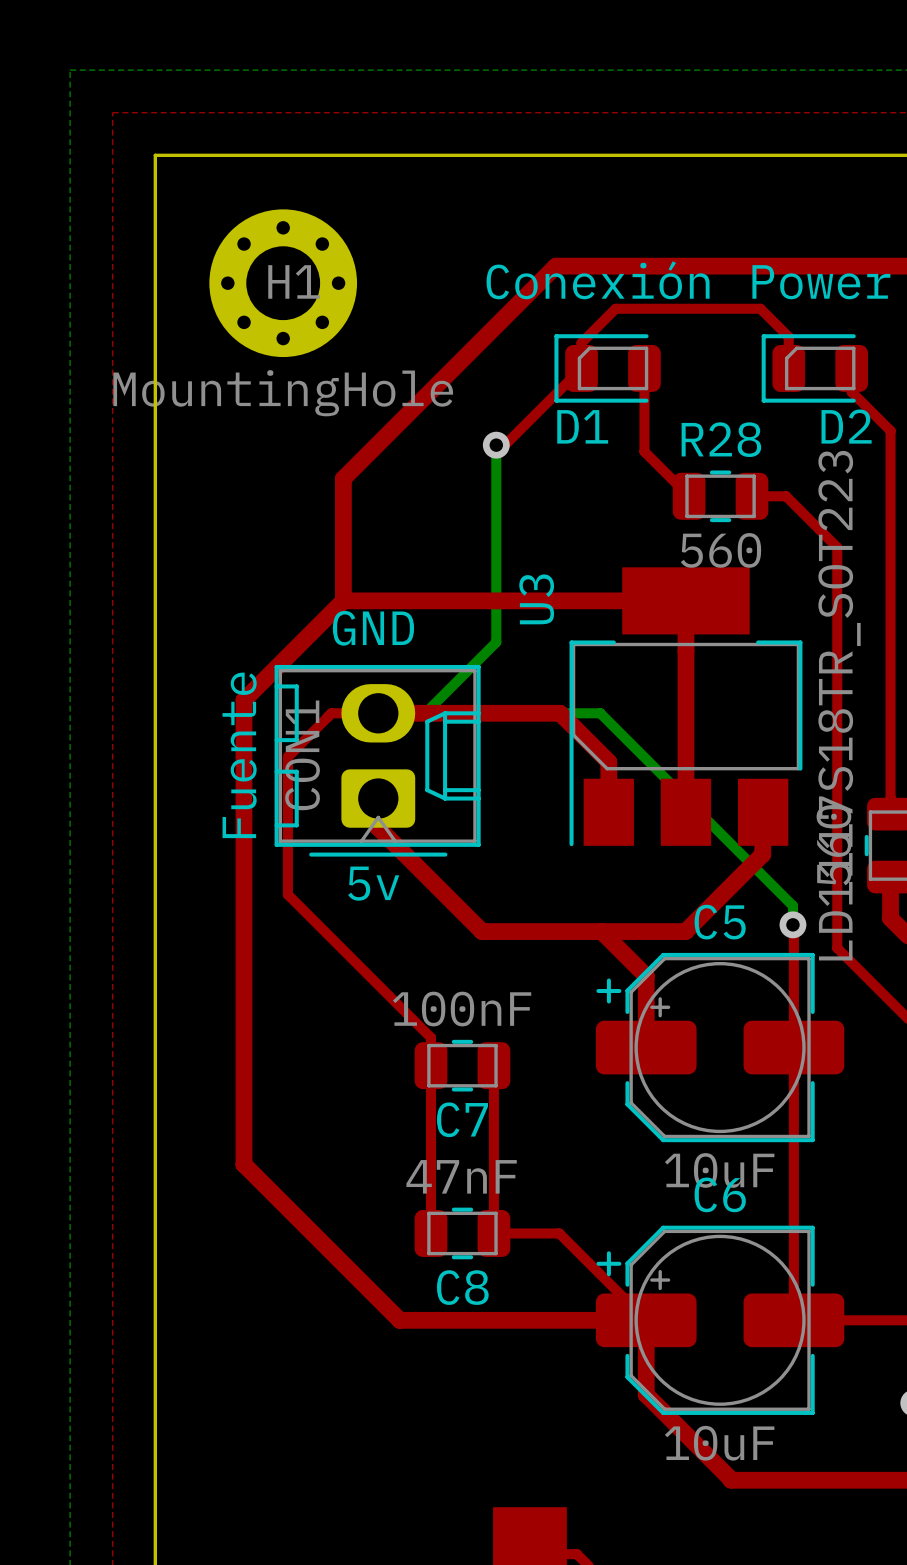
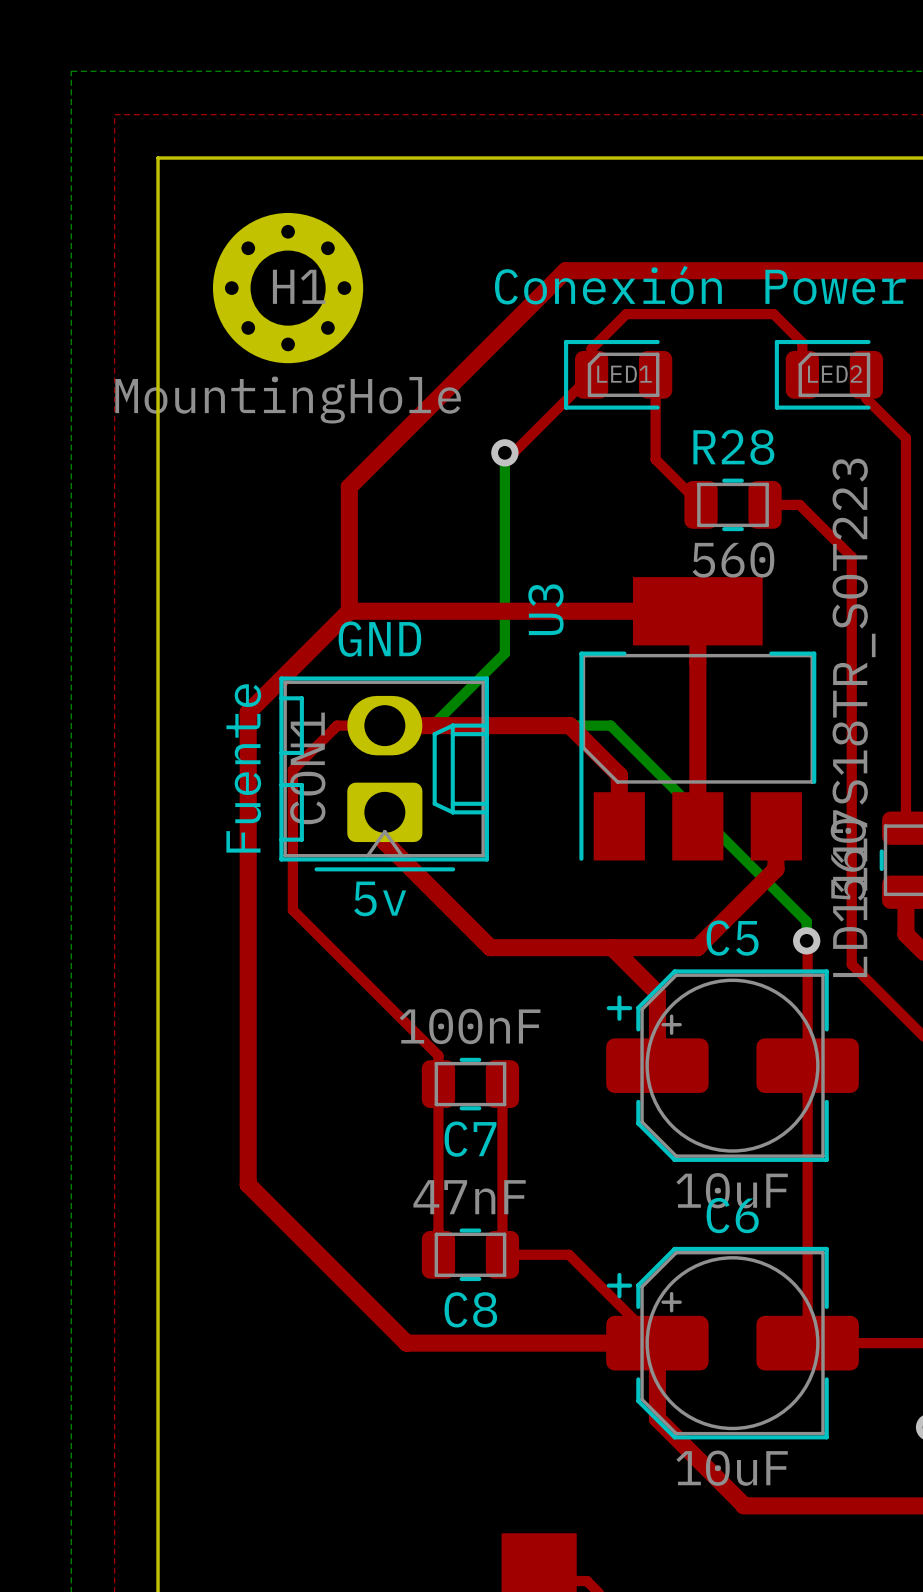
D1 name: D1 (582, 426) -> LED1 (624, 374)
D2 name: D2 (846, 426) -> LED2 (835, 374)

